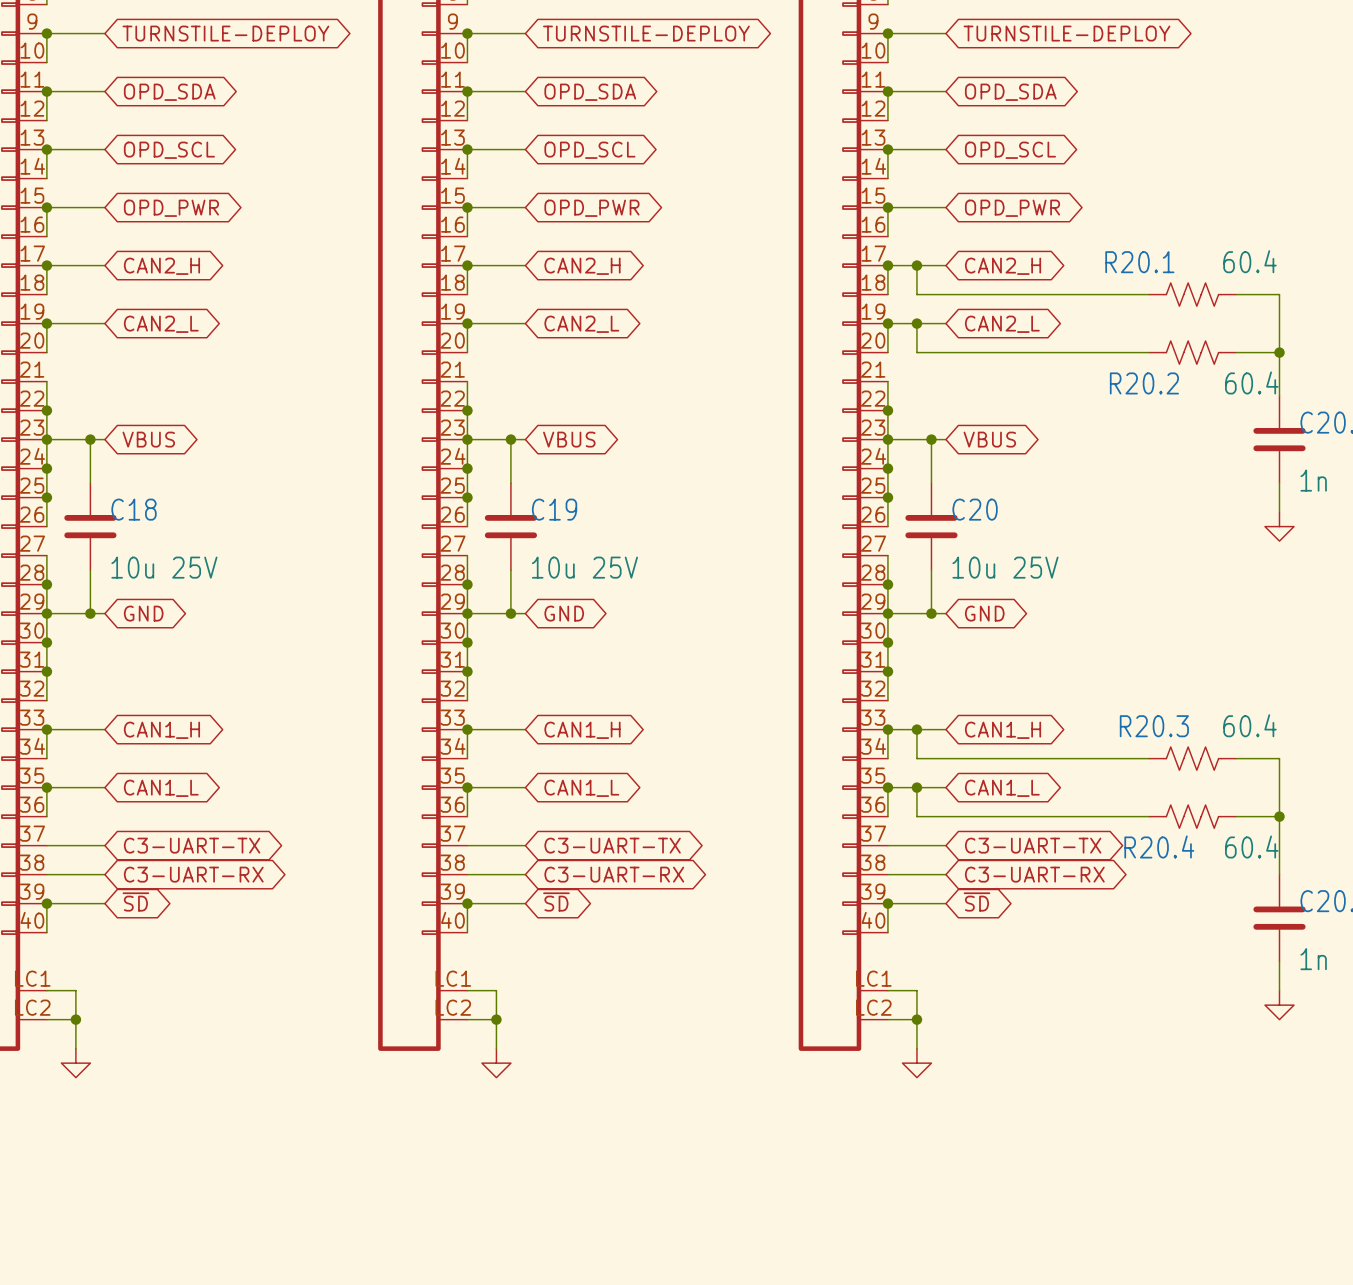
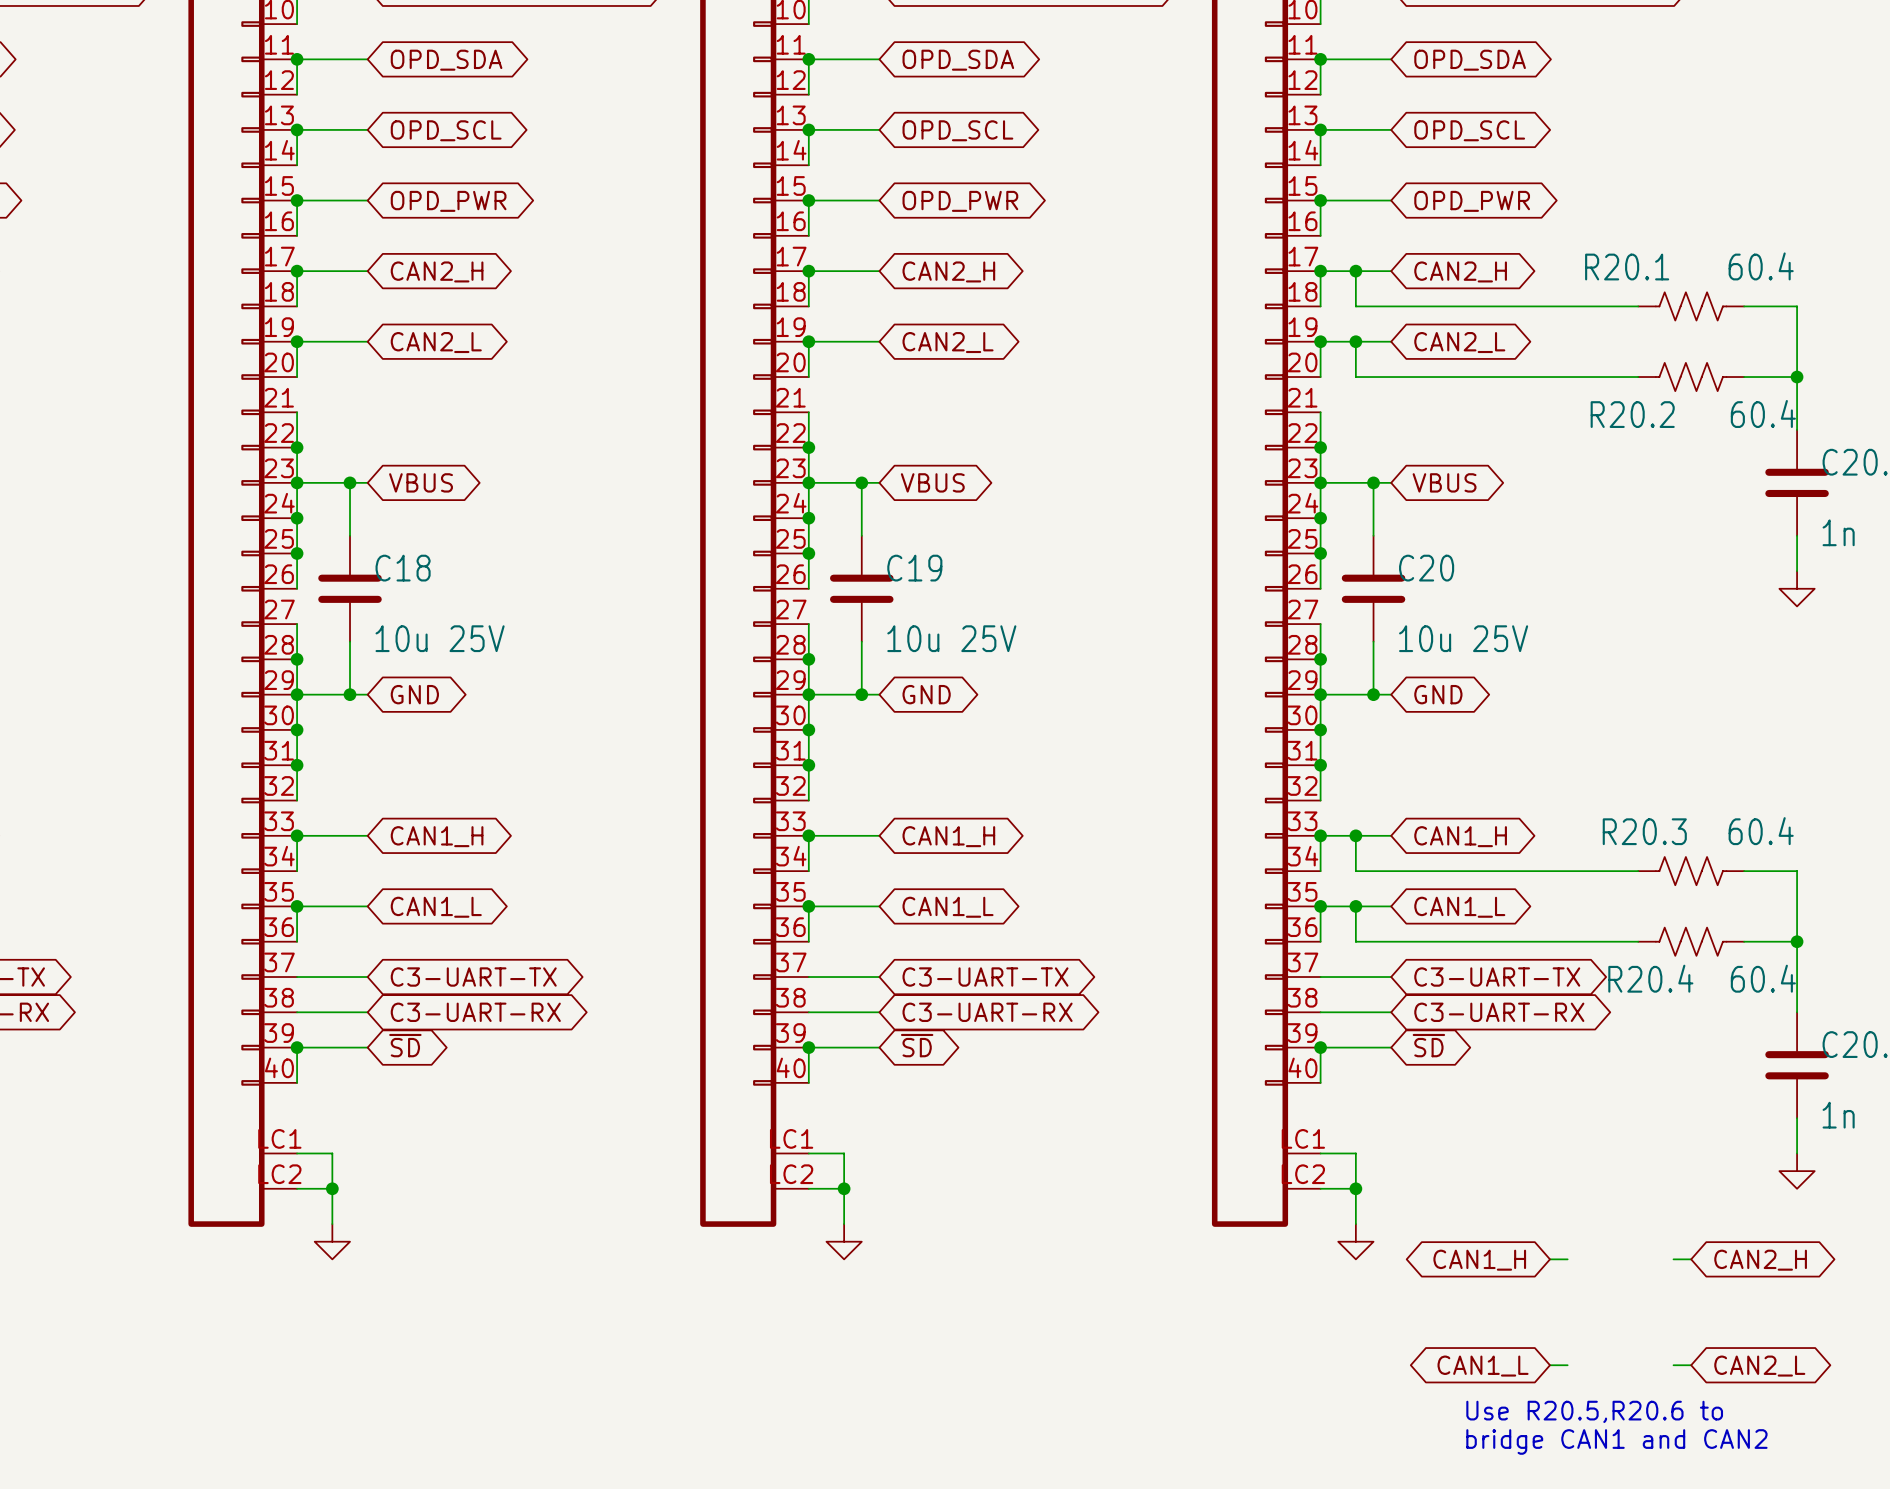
wire: none -> (1550, 1259) (1567, 1259)
wire: none -> (1673, 1259) (1691, 1259)
global label: none -> CAN1_H (1479, 1260)
global label: none -> CAN2_H (1760, 1260)
wire: none -> (1550, 1365) (1567, 1365)
wire: none -> (1673, 1365) (1691, 1365)
global label: none -> CAN1_L (1483, 1366)
global label: none -> CAN2_L (1759, 1366)
text: none -> Use R20.5,R20.6 to (1594, 1411)
text: none -> bridge CAN1 and CAN2 (1616, 1441)

